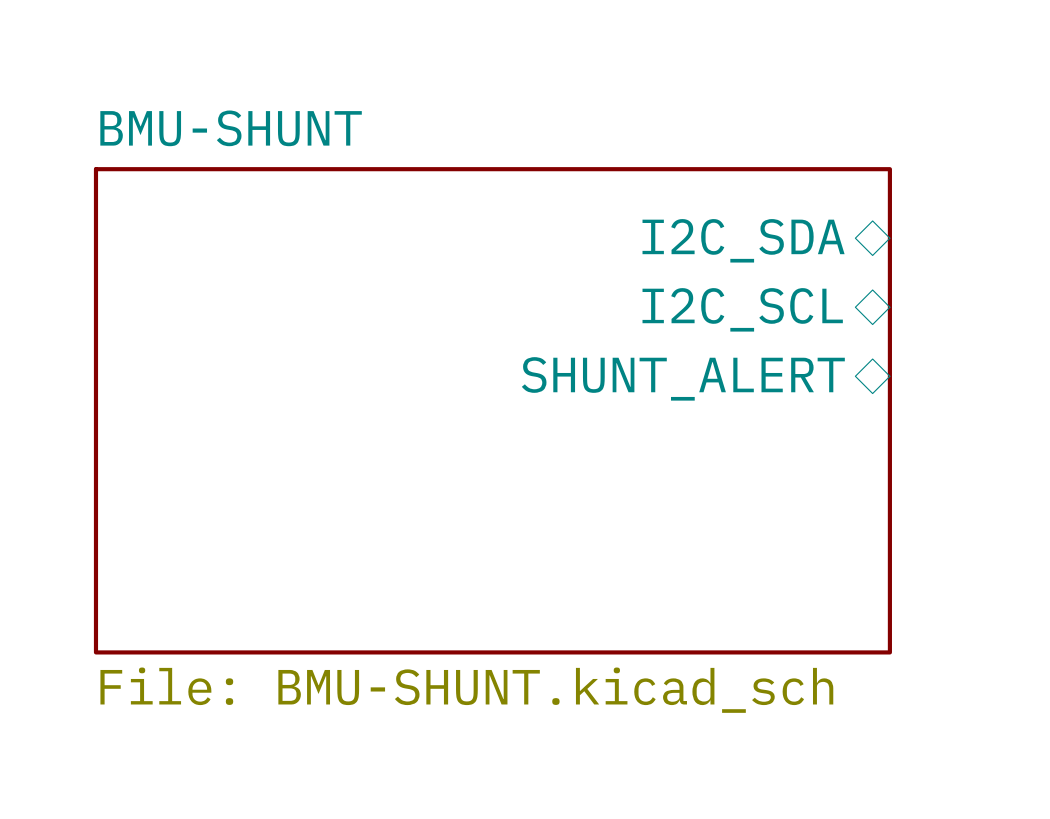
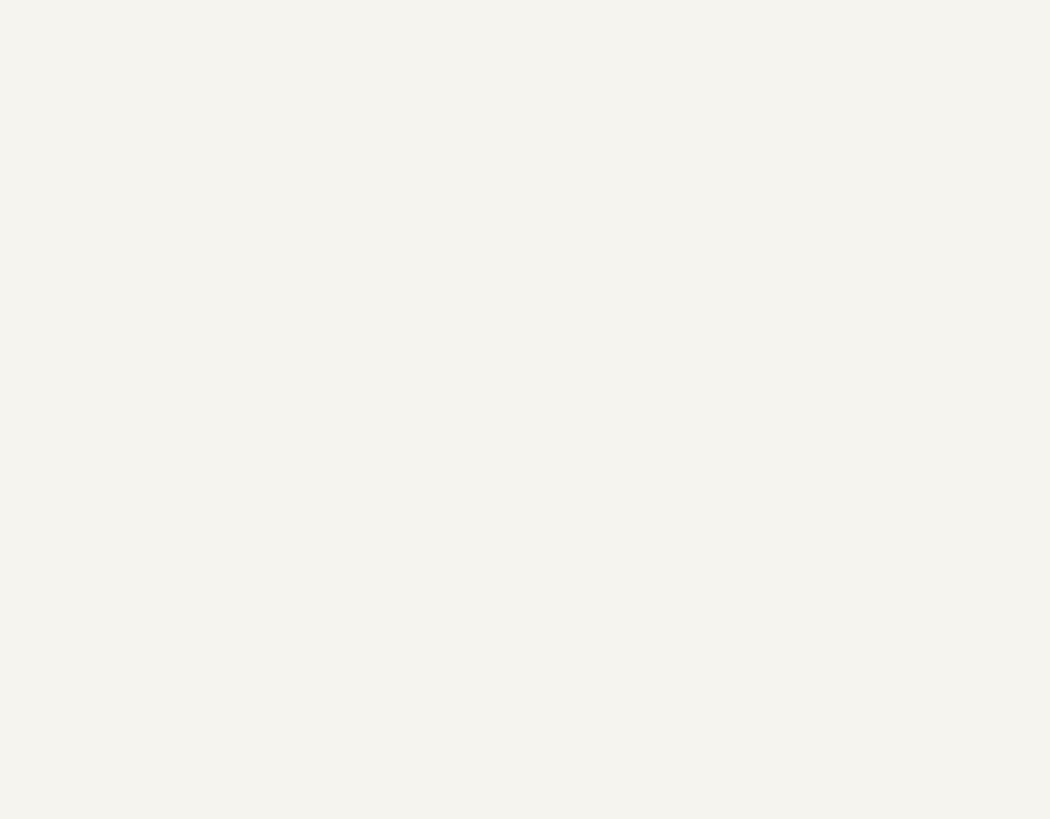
sheet pin: I2C_SDA (743, 240) -> none
sheet pin: I2C_SCL (742, 309) -> none
sheet pin: SHUNT_ALERT (683, 378) -> none
sheet BMU-SHUNT: File: BMU-SHUNT.kicad_sch (492, 410) -> none

